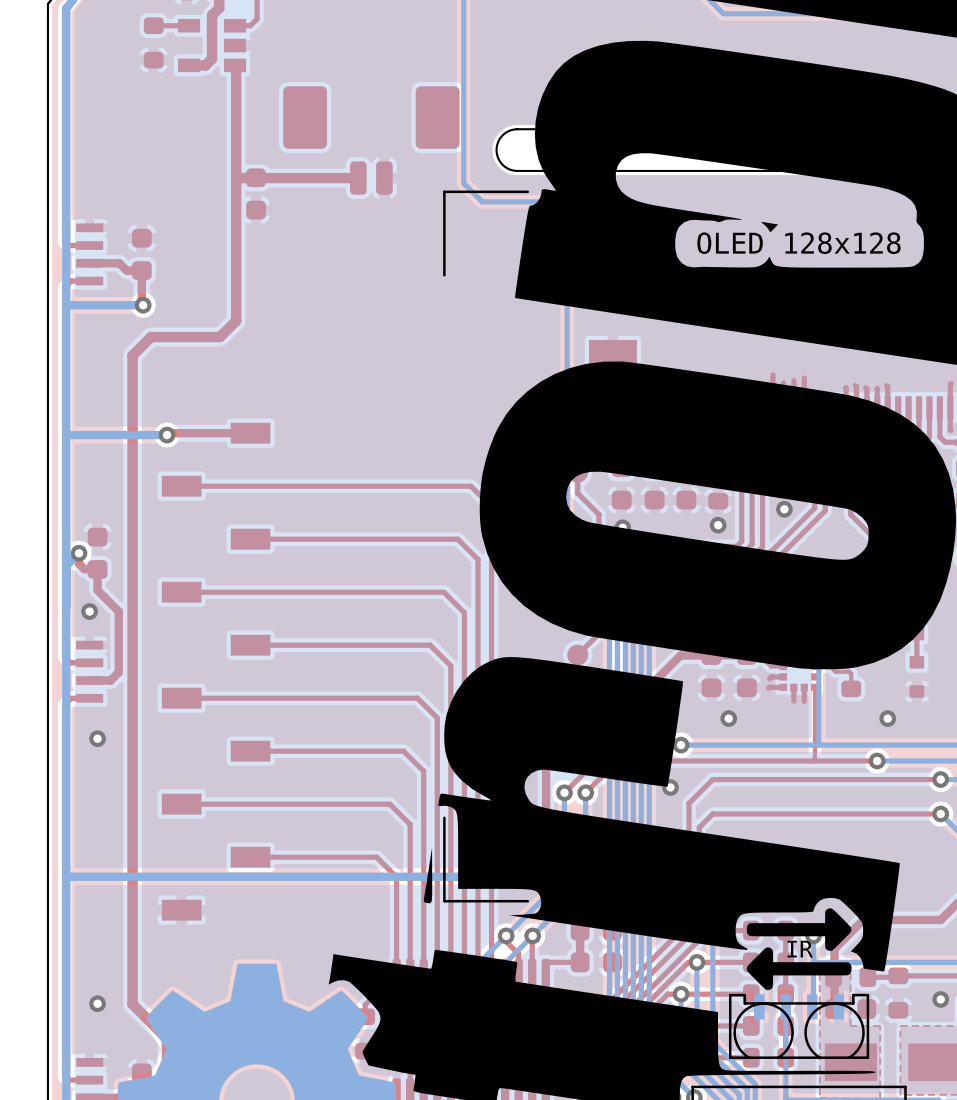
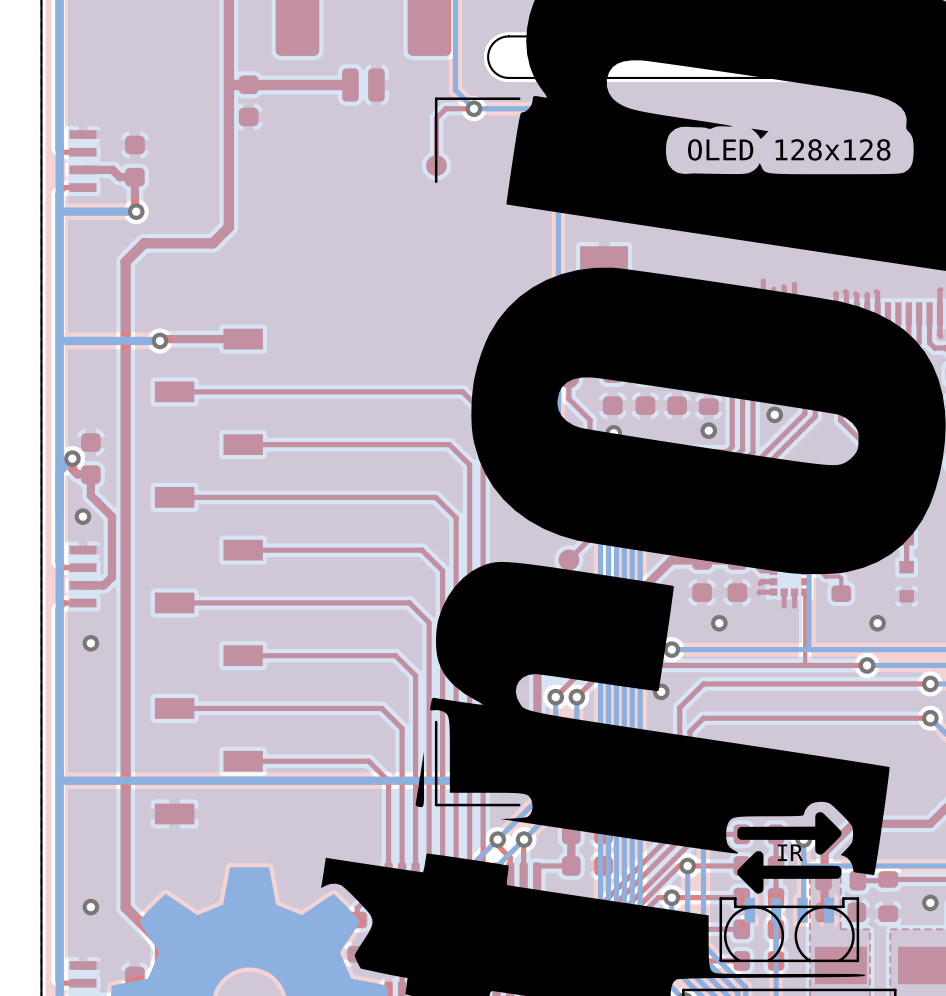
top track: none -> (473, 108) (445, 108) (436, 118) (436, 165)
via: none -> (473, 108)
part: none -> (436, 165)

